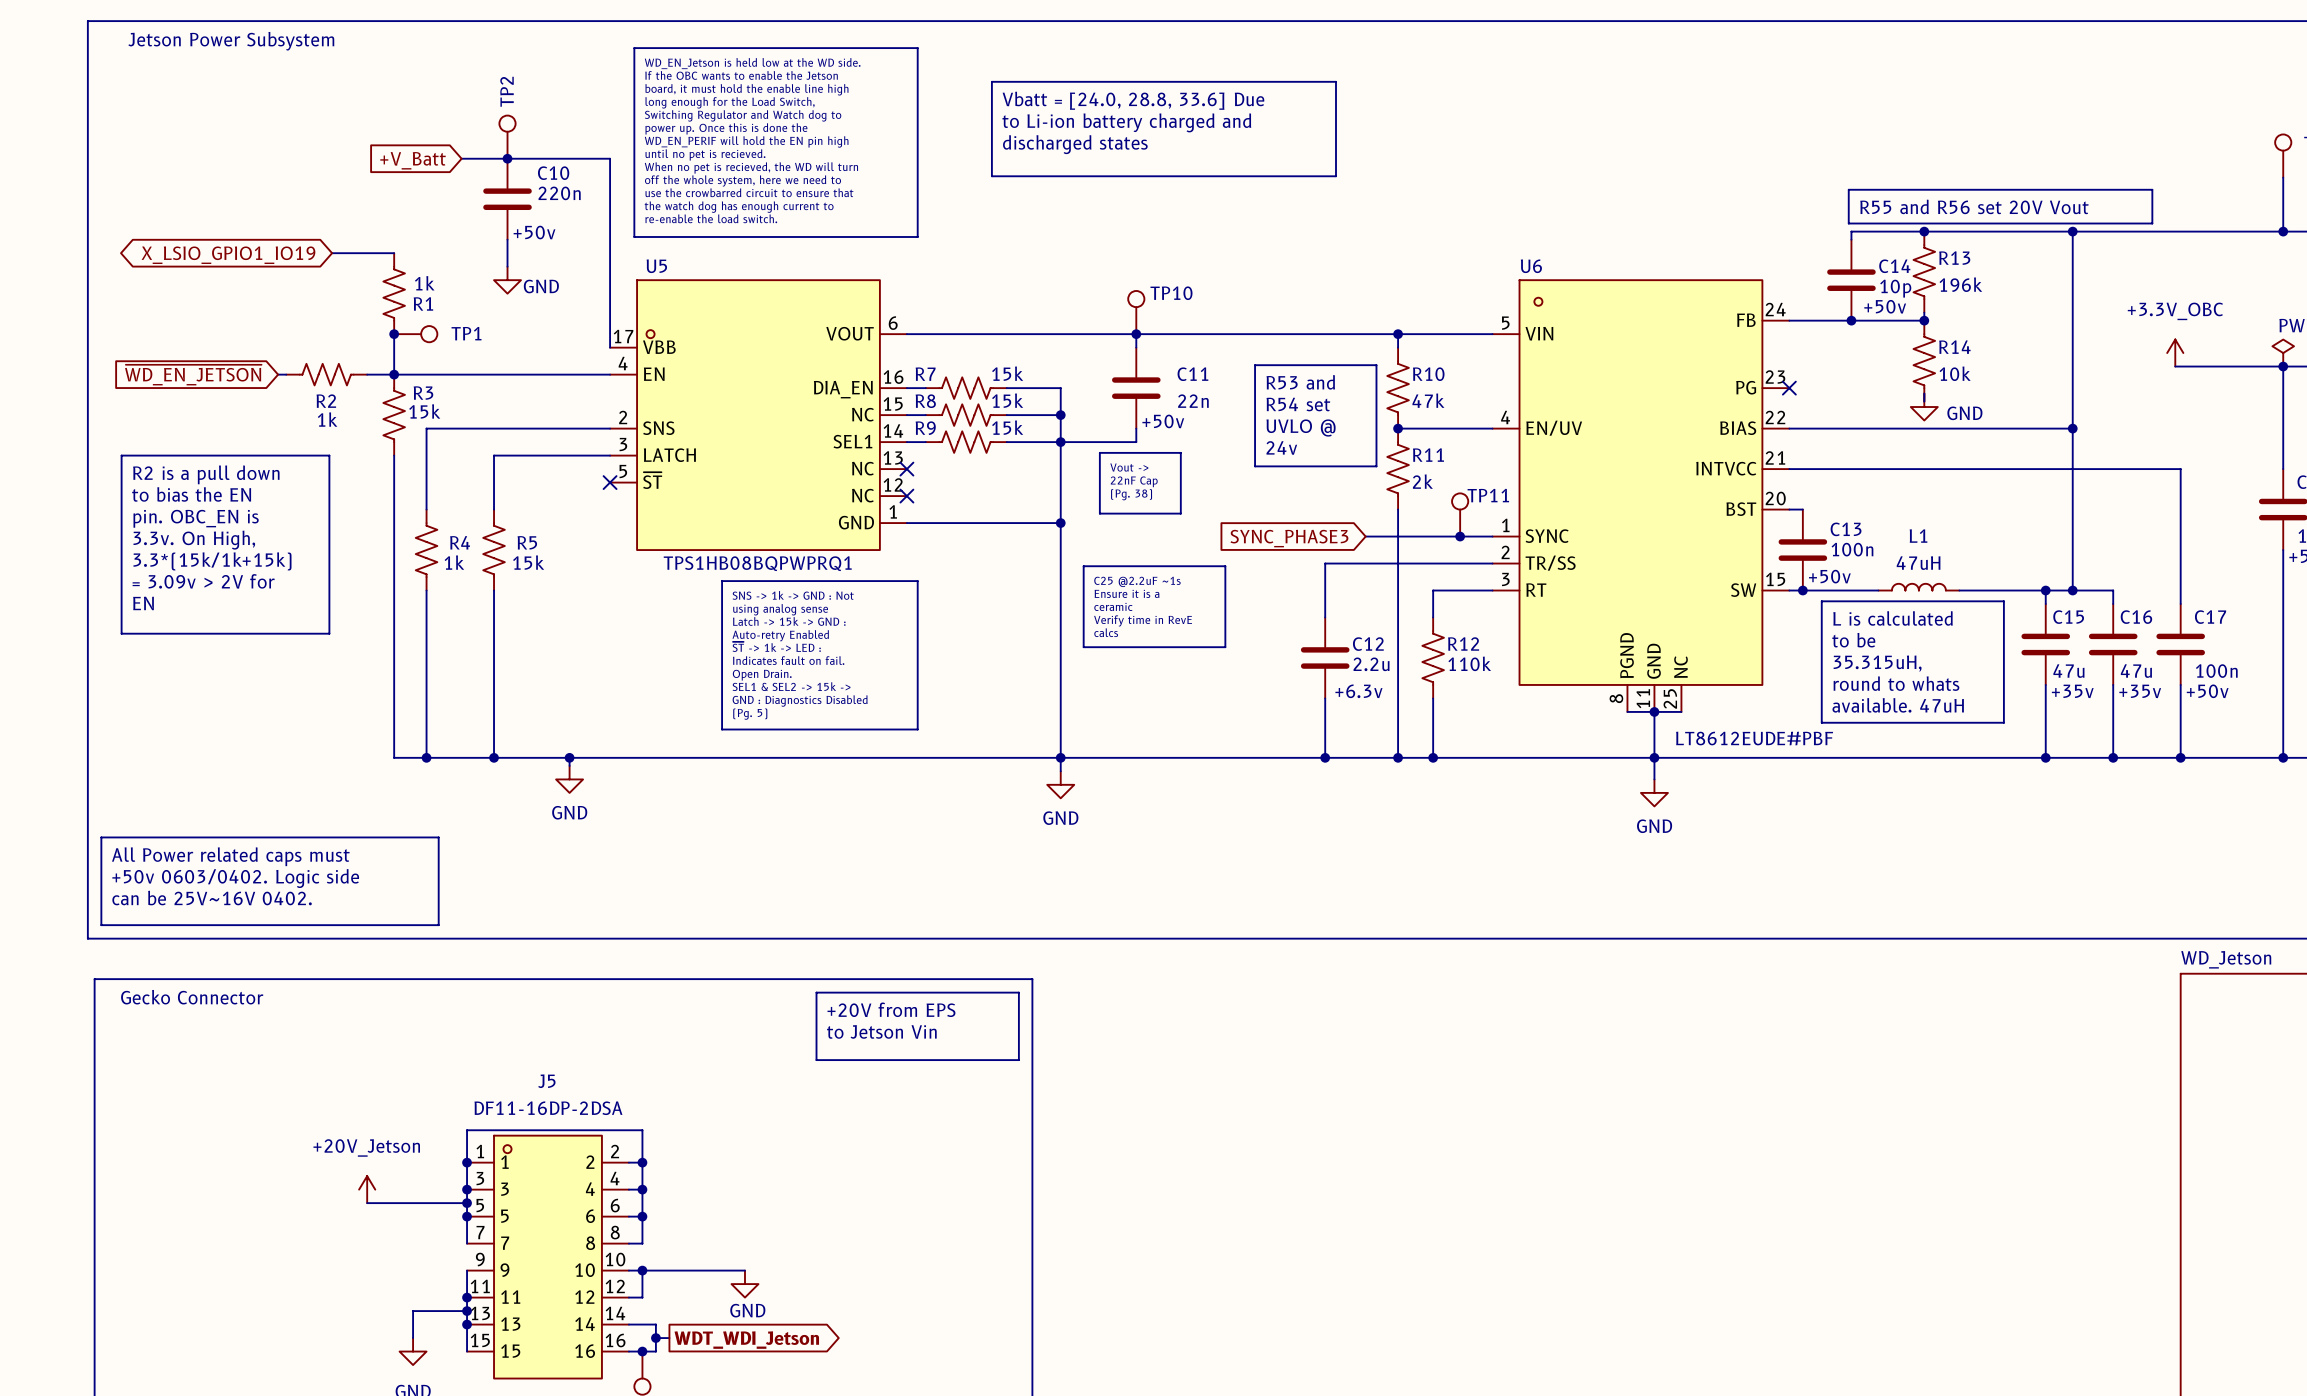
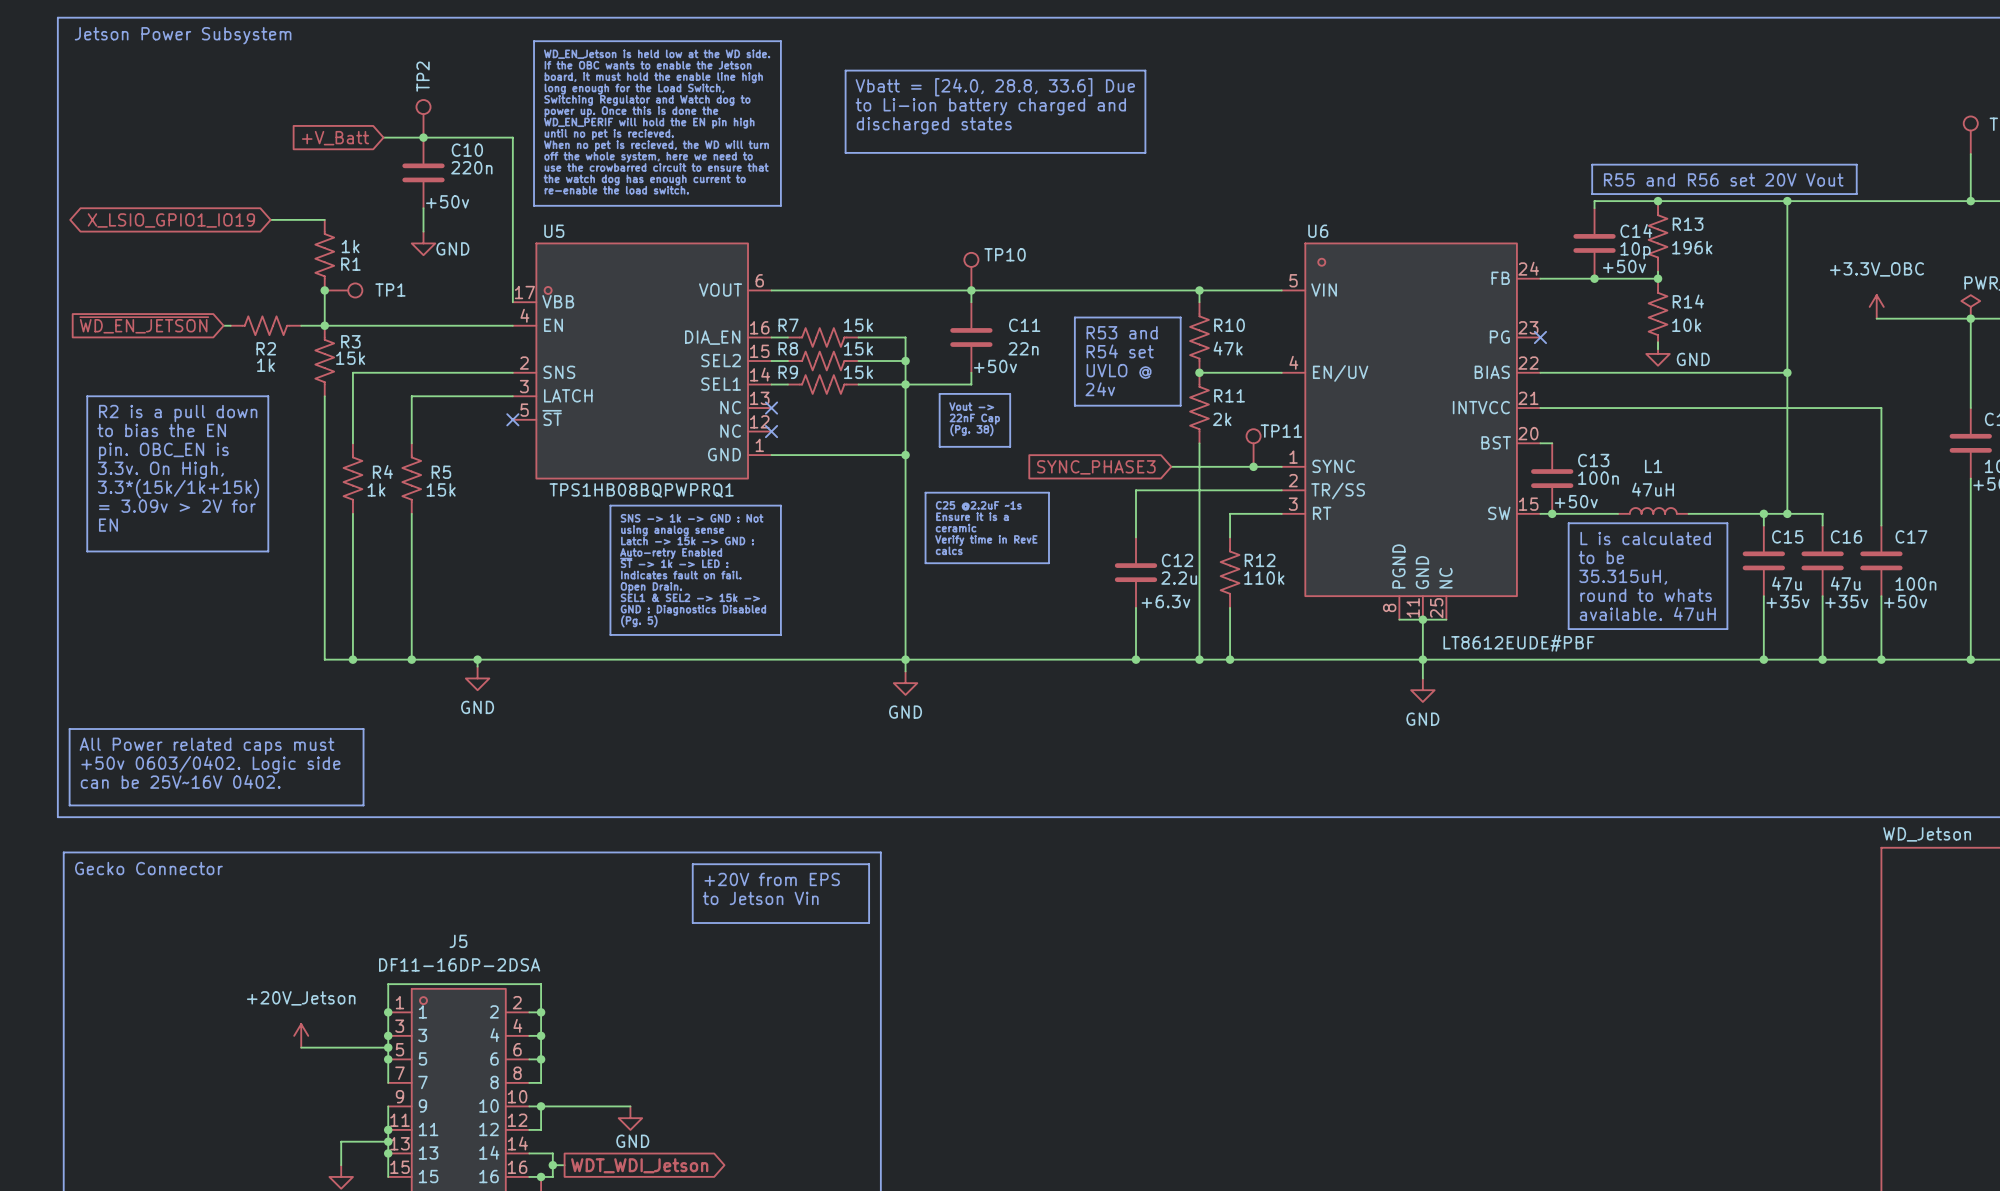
U5 pin name: NC (862, 414) -> SEL2 (721, 360)

